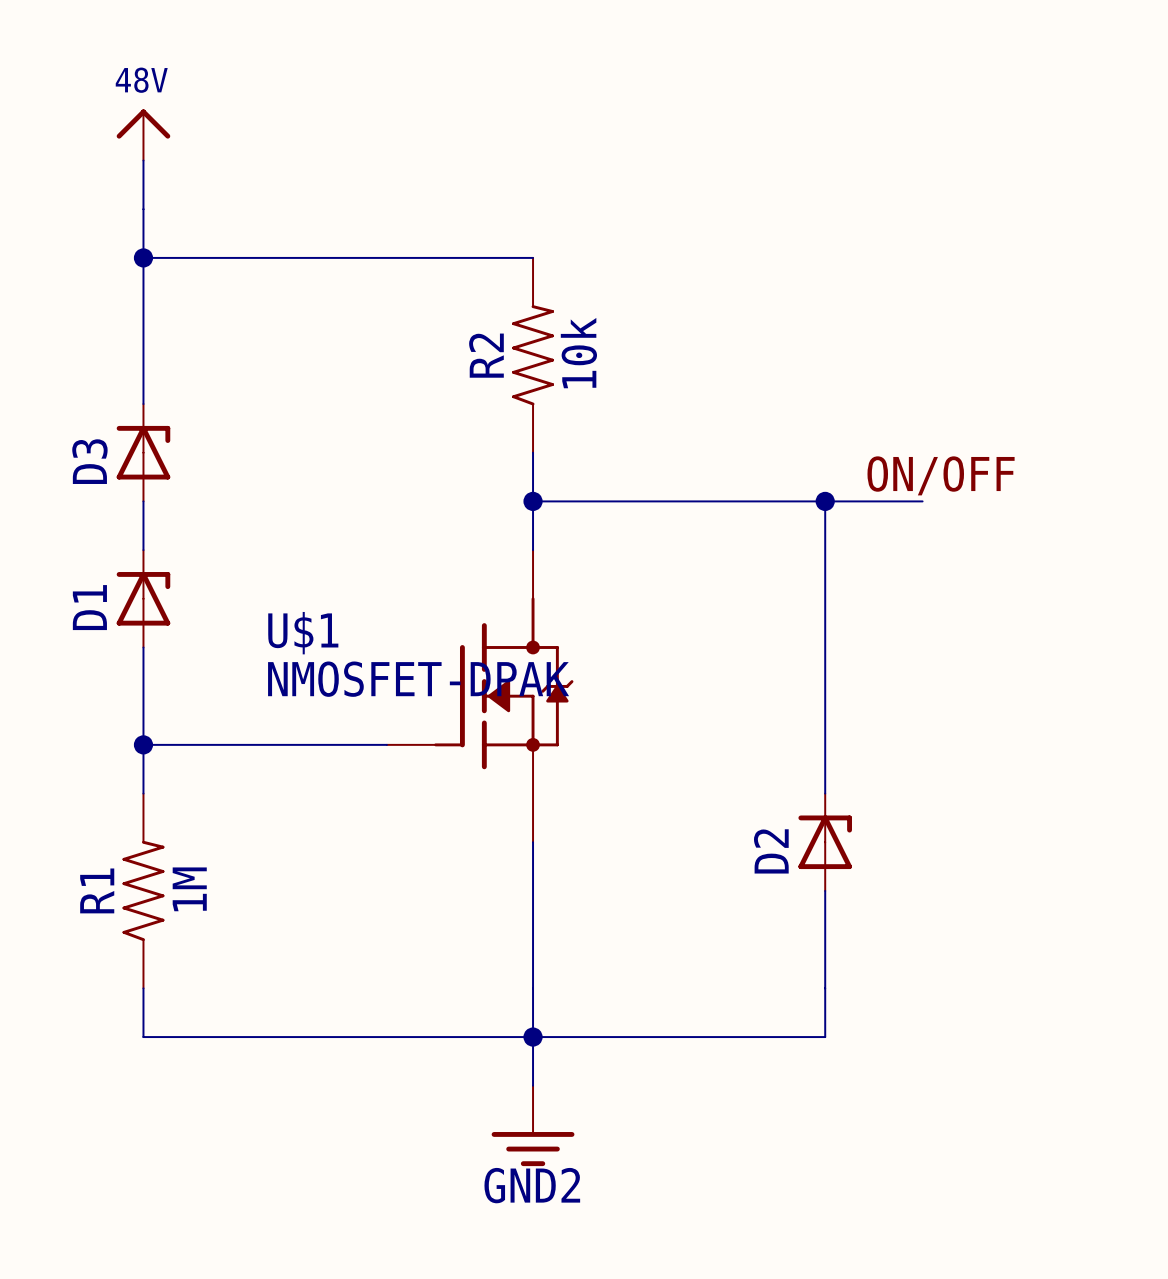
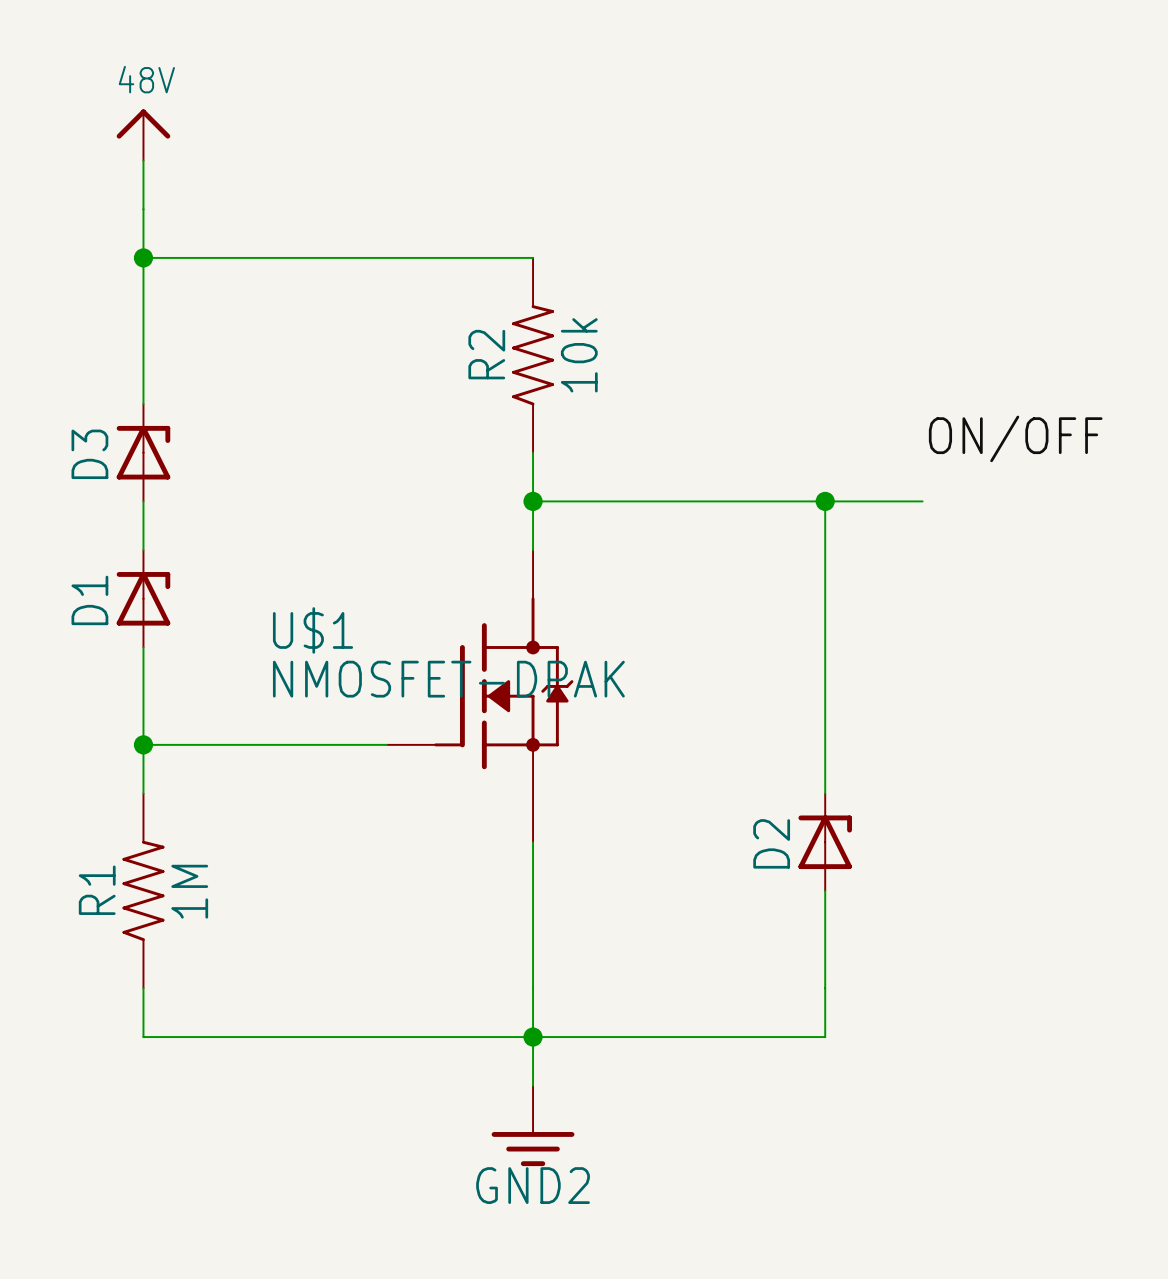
label position: ON/OFF (941, 475) -> ON/OFF (1015, 438)

